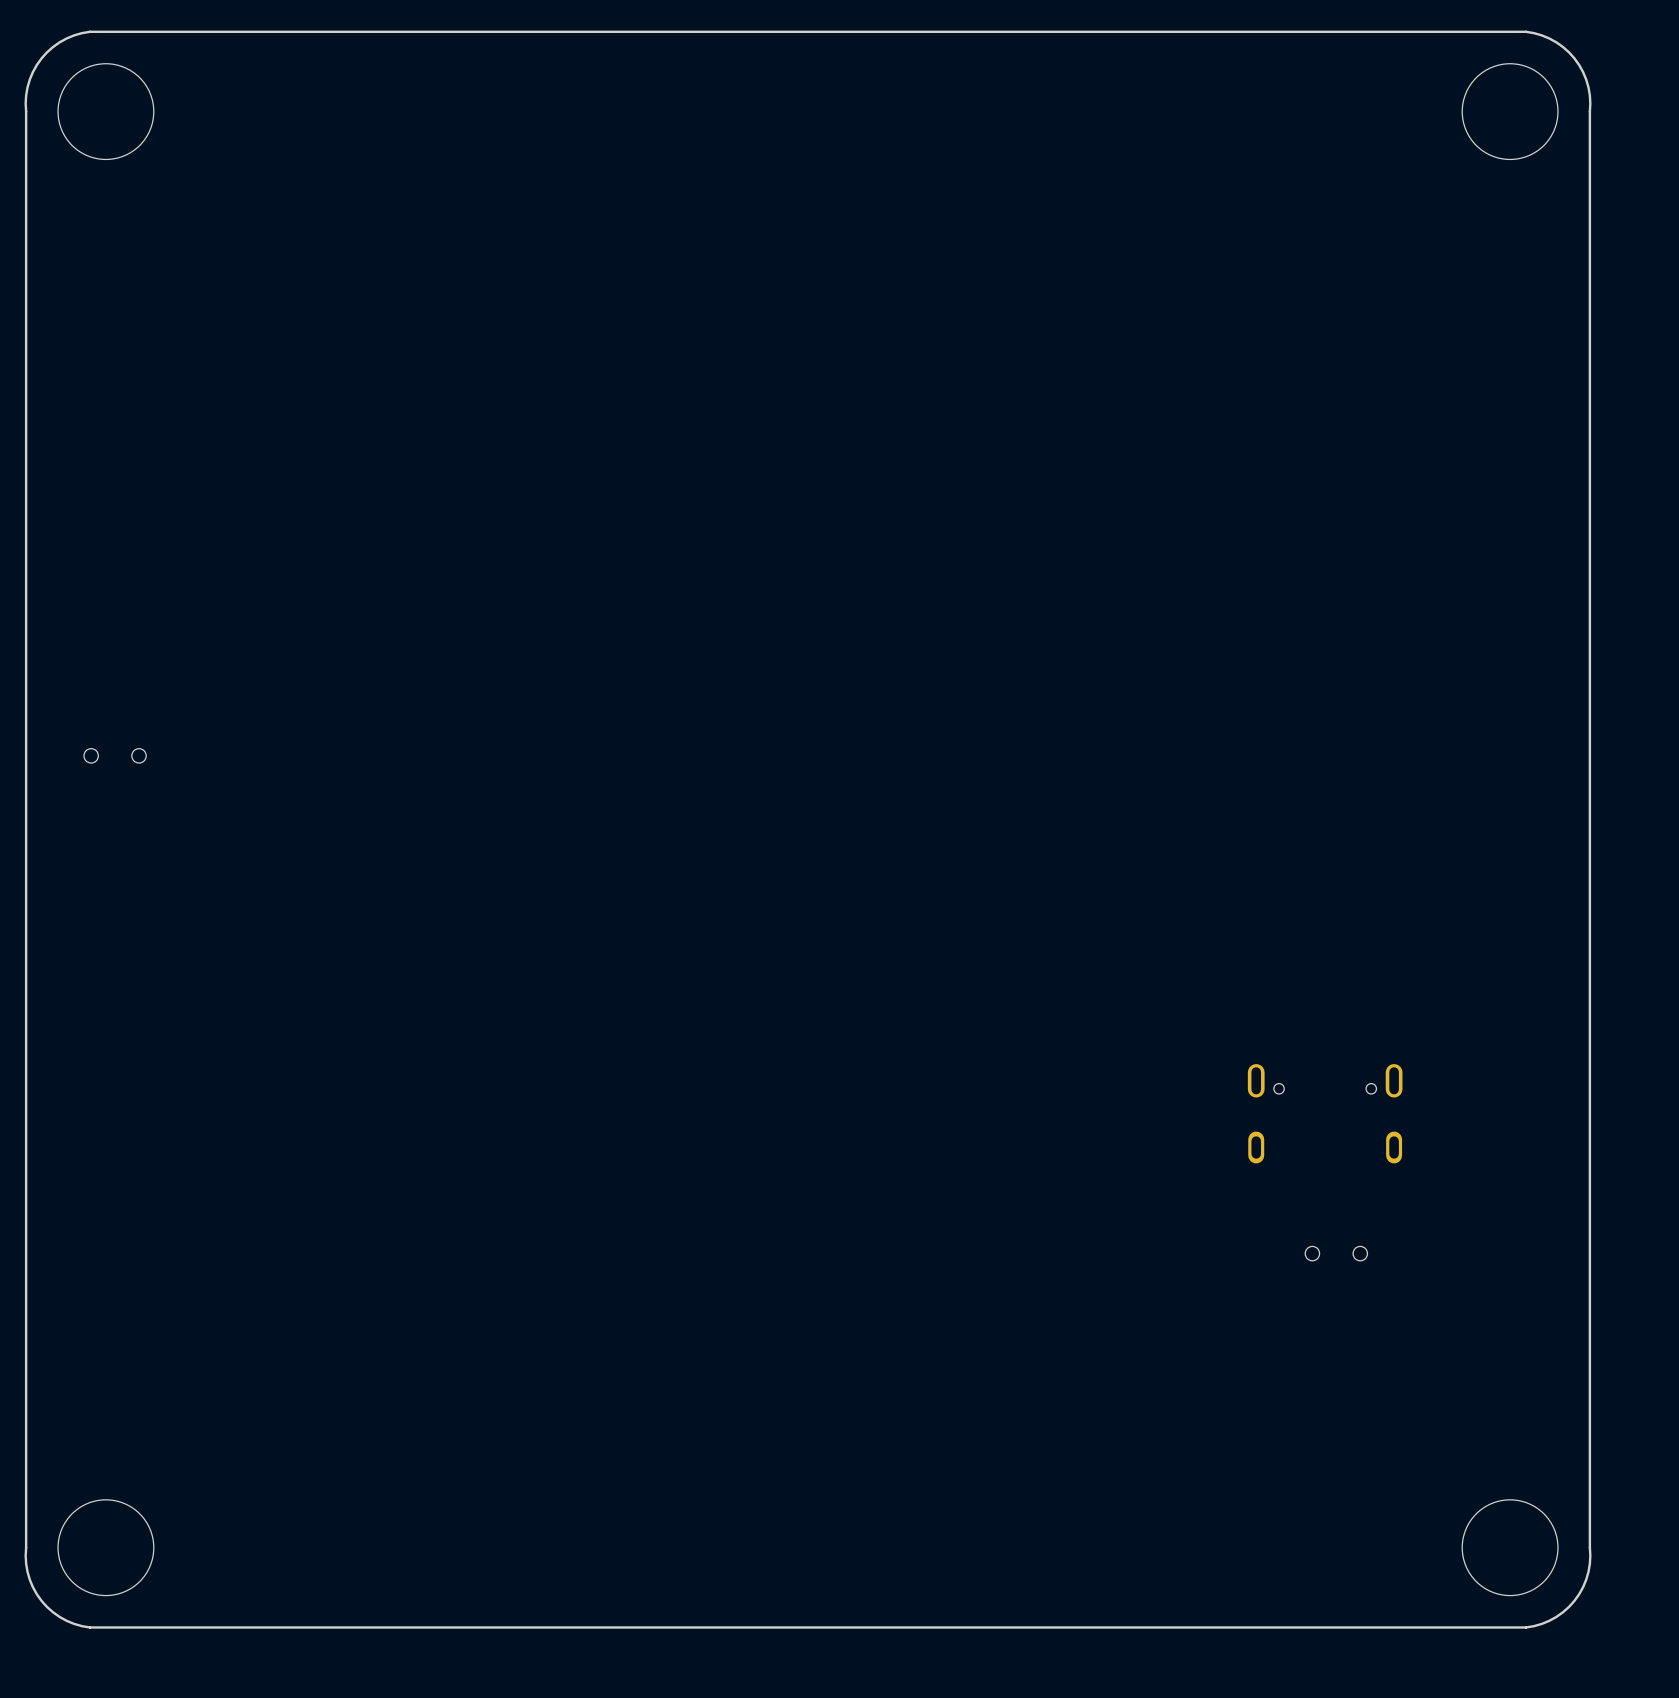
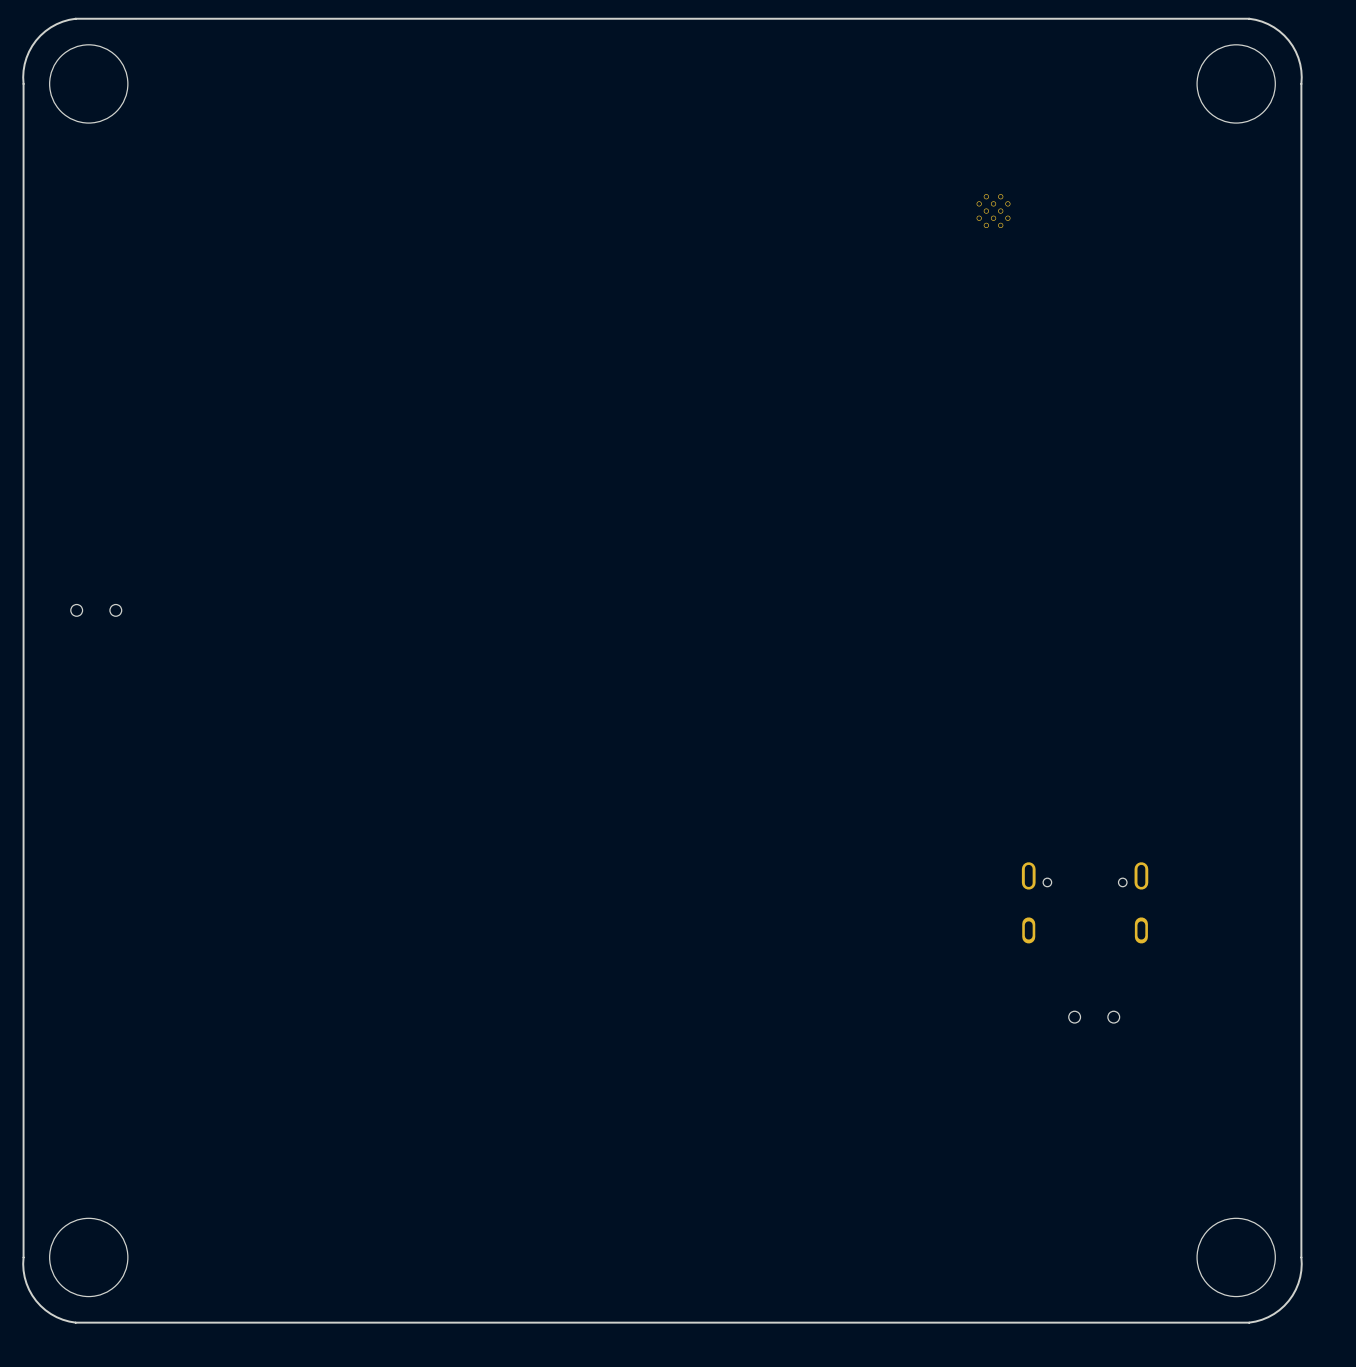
part: none -> (993, 211)

